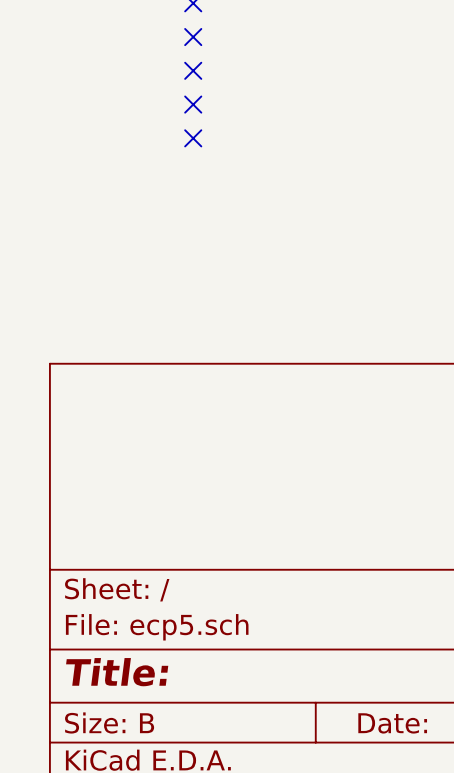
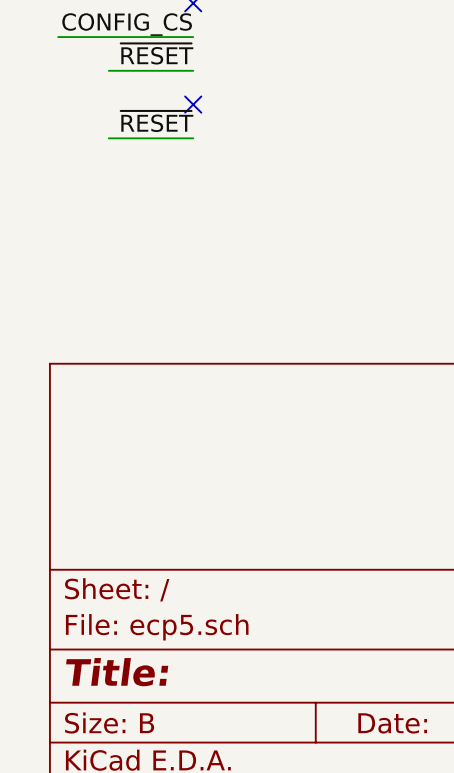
label: none -> CONFIG_CS (127, 24)
wire: none -> (58, 37) (193, 37)
no-connect mark: (193, 37) -> none
label: none -> ~{RESET} (157, 53)
wire: none -> (108, 70) (193, 70)
no-connect mark: (193, 70) -> none
label: none -> ~{RESET} (157, 121)
wire: none -> (108, 138) (193, 138)
no-connect mark: (193, 138) -> none

